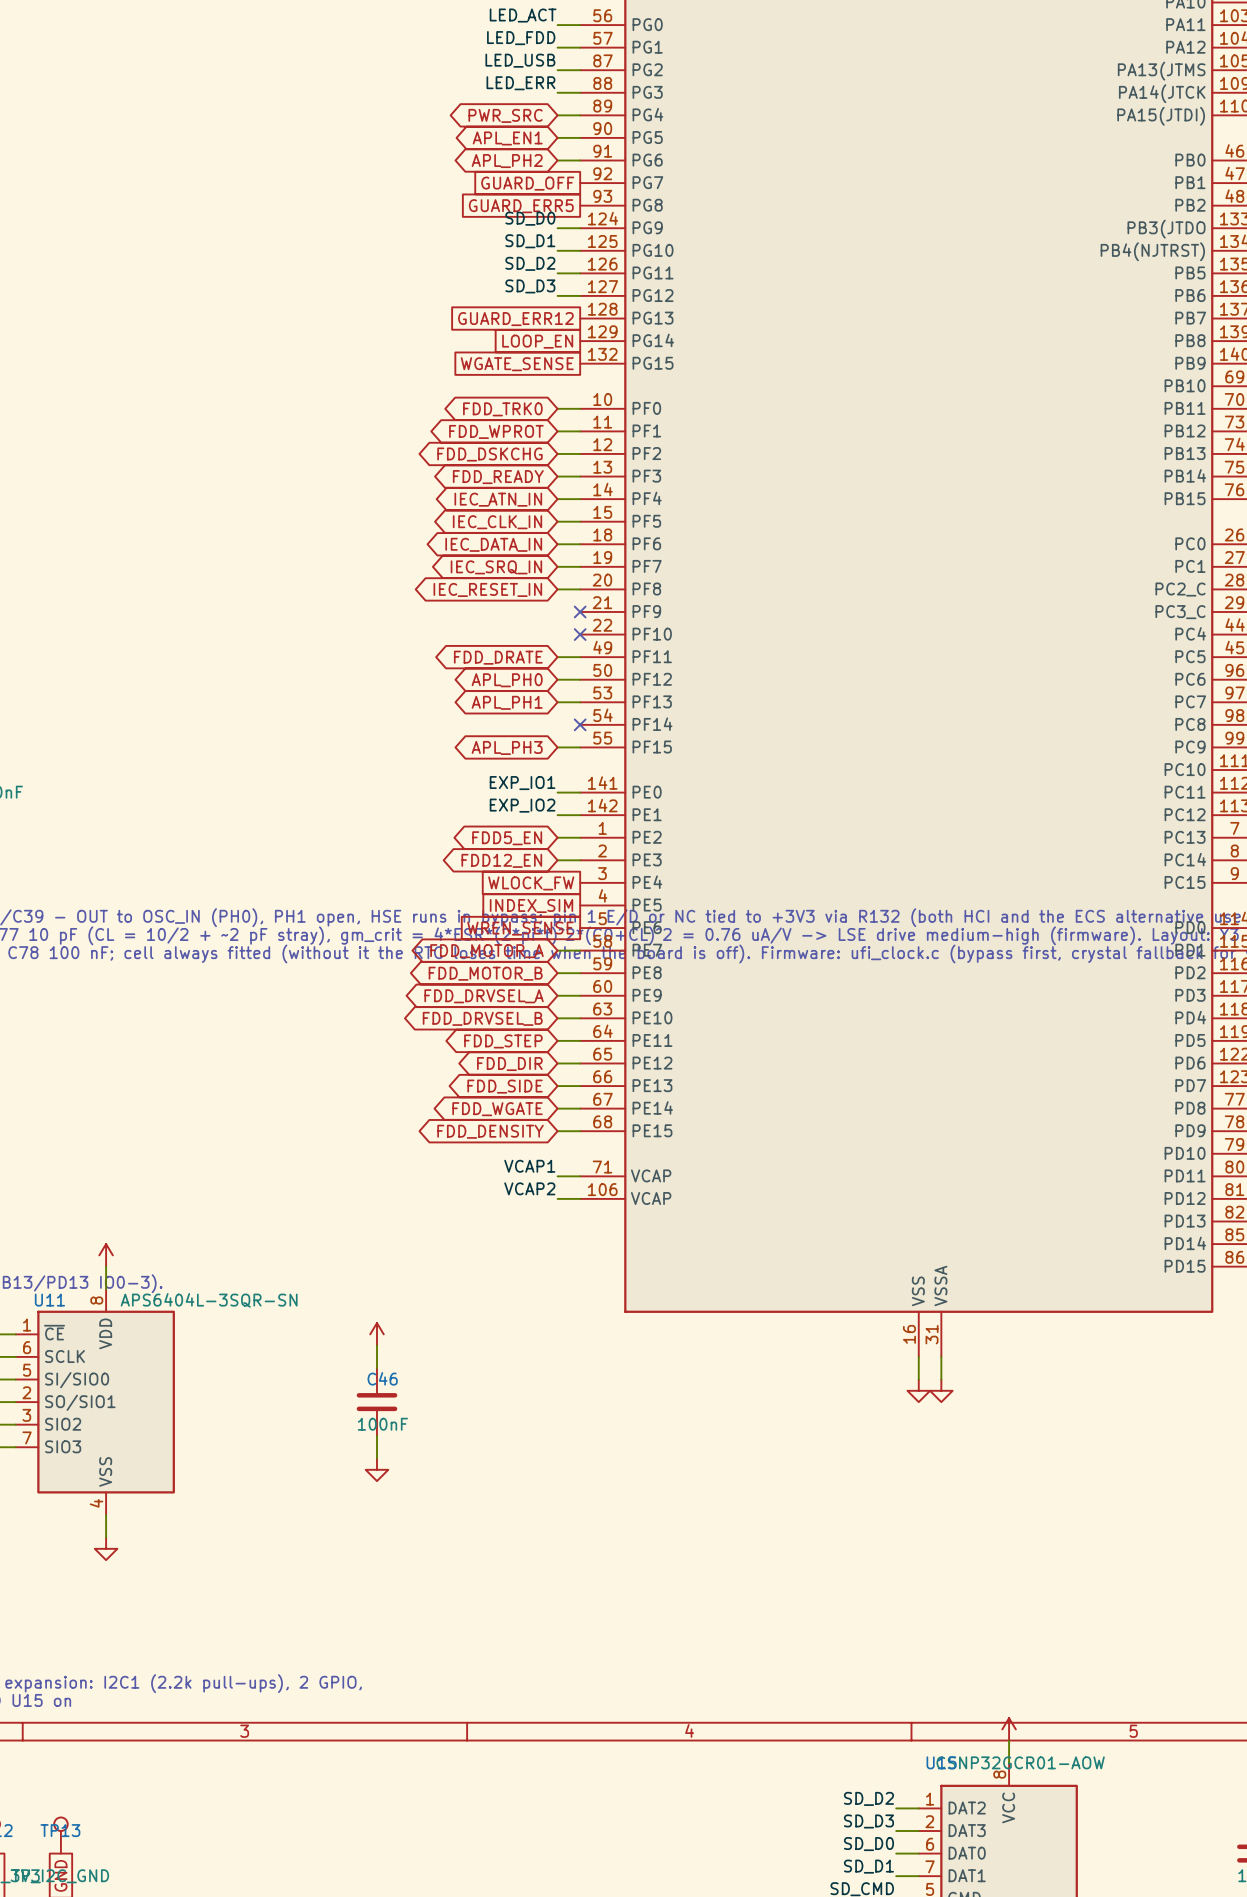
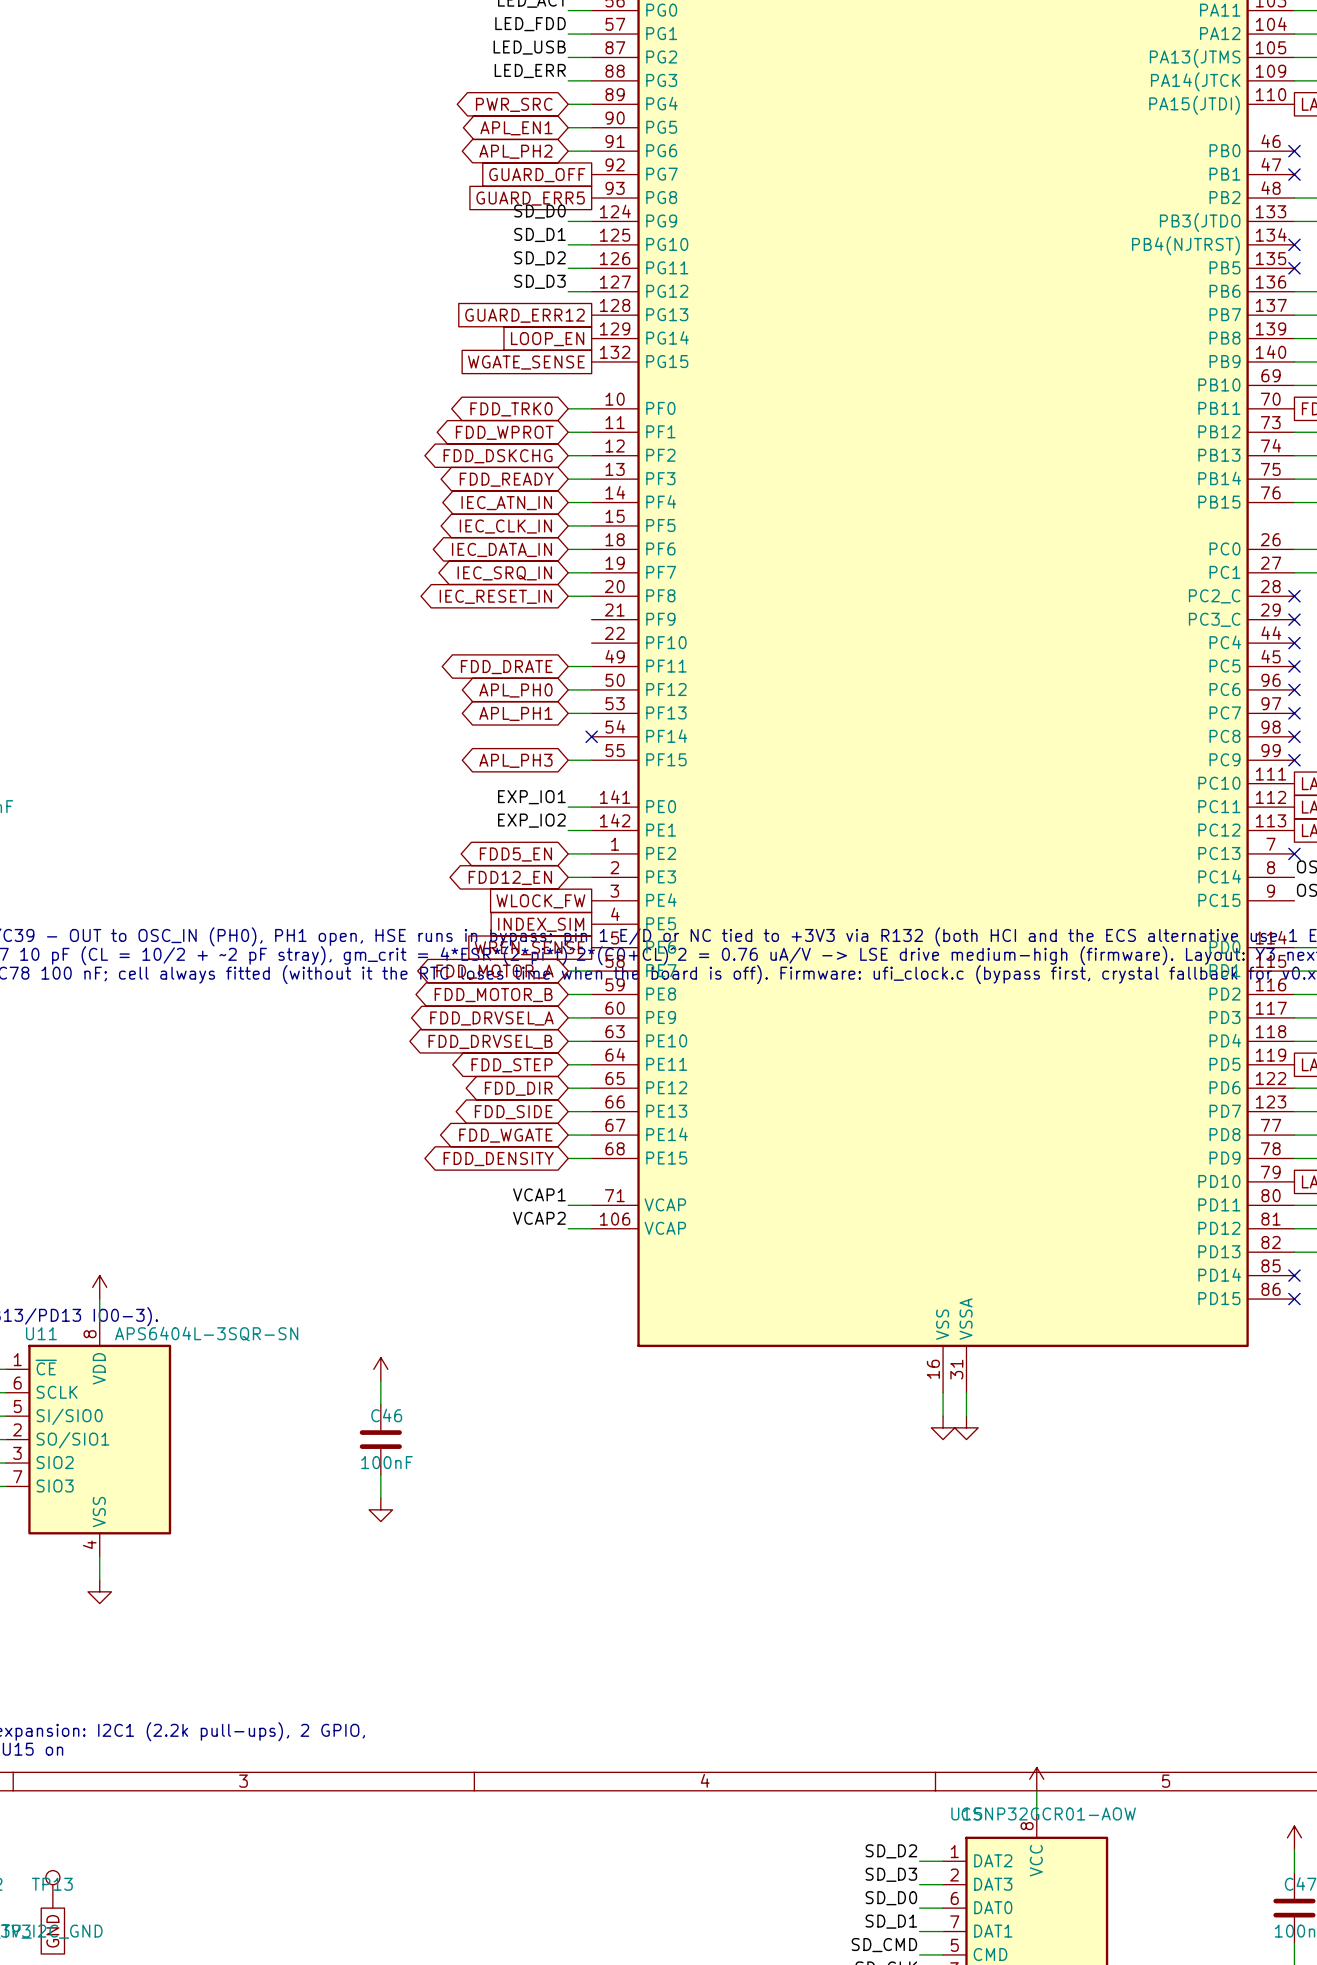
no-connect mark: (580, 611) -> none
no-connect mark: (580, 634) -> none

